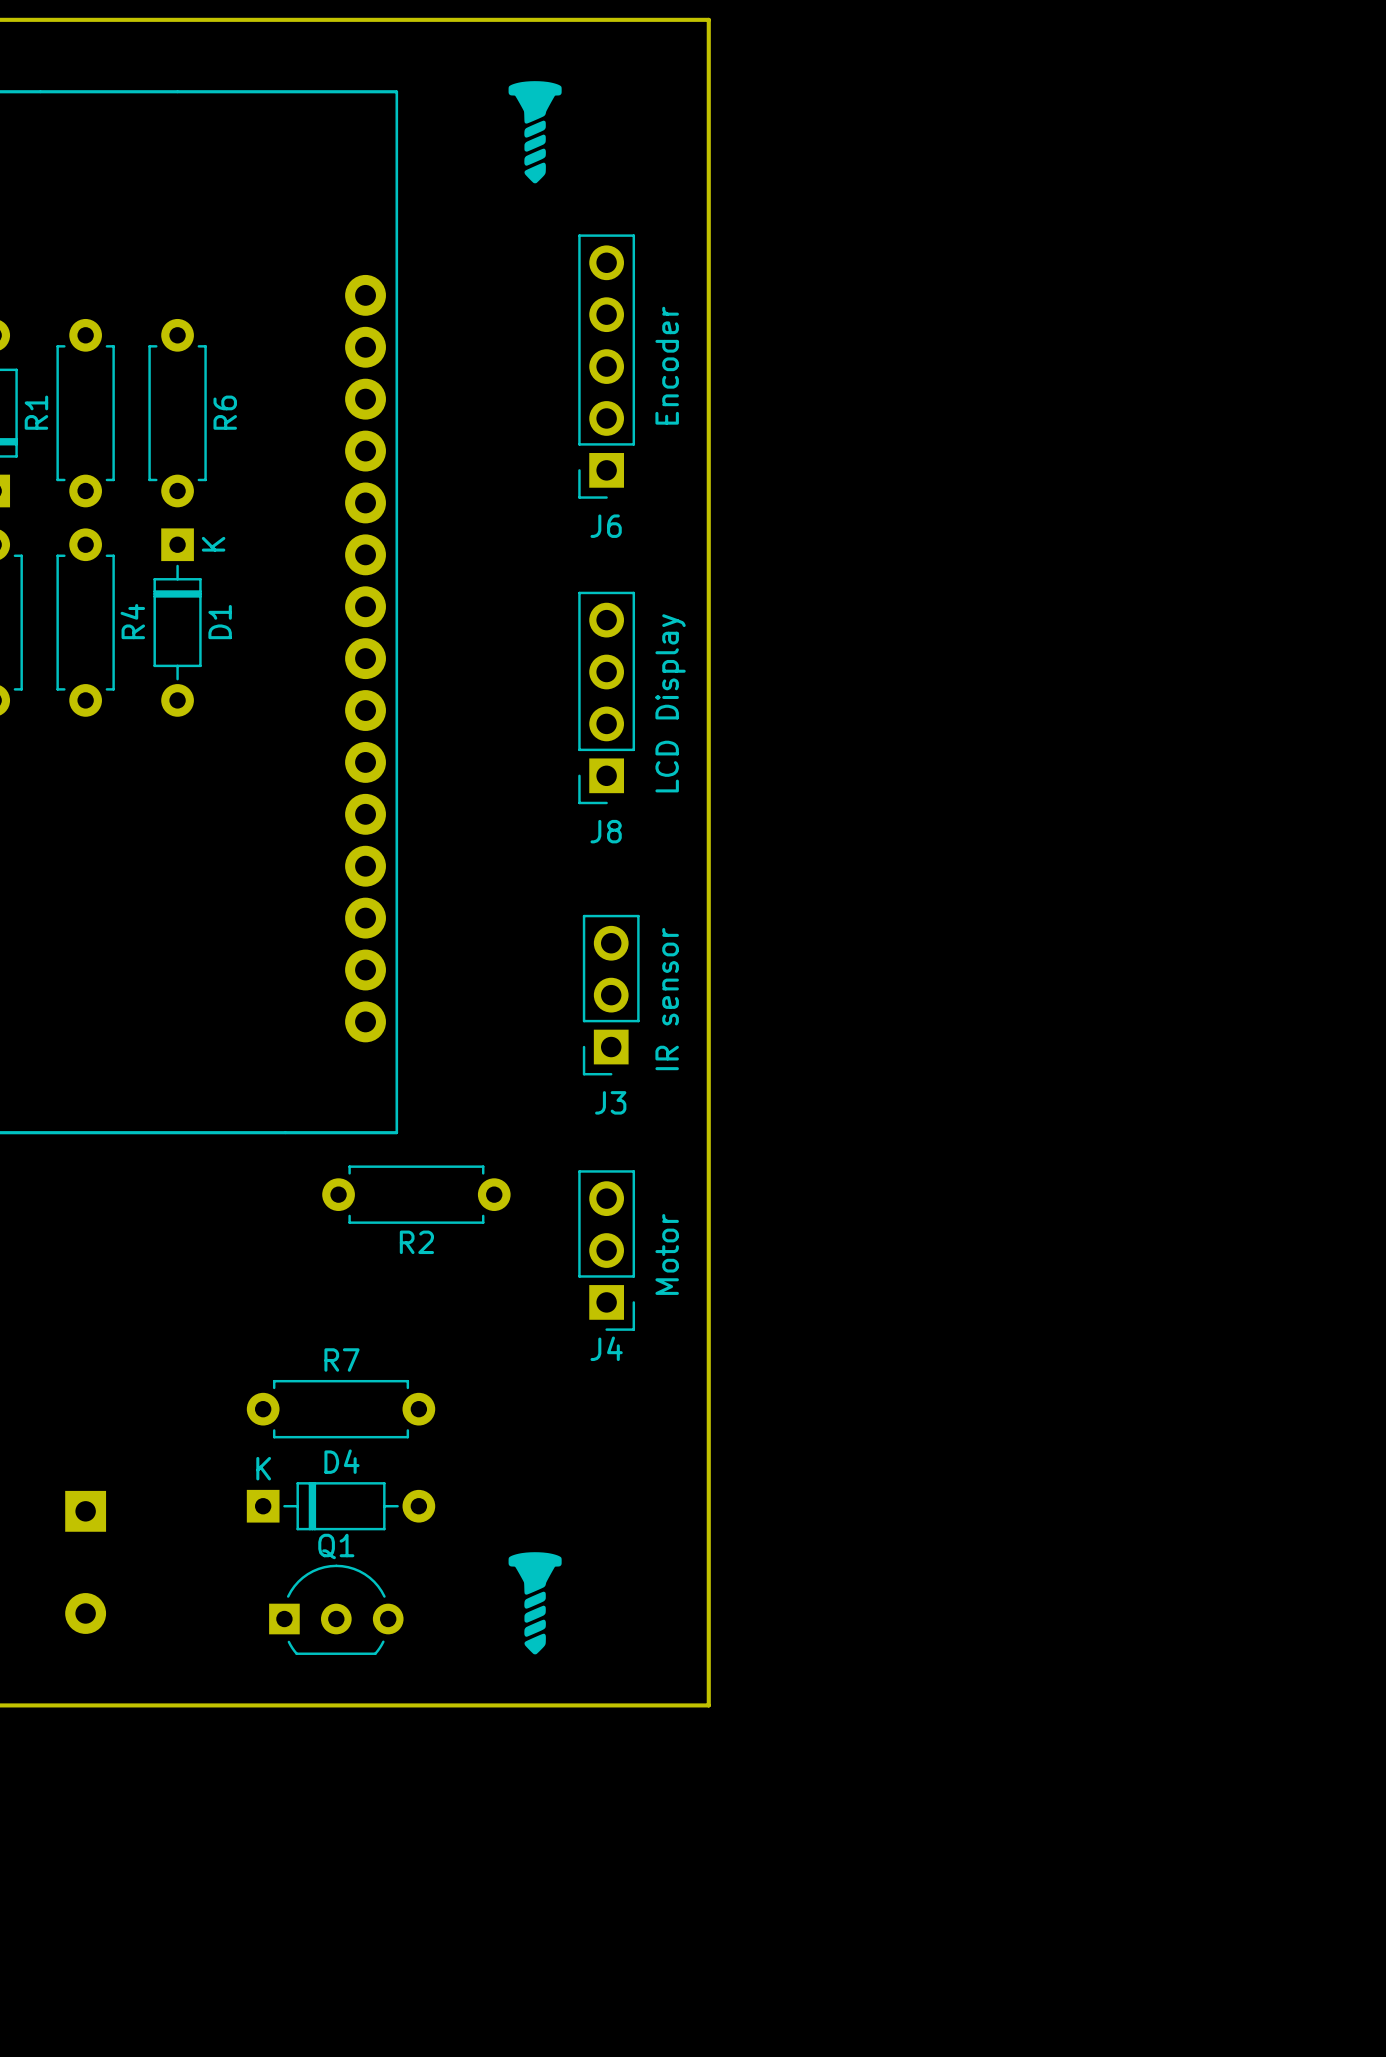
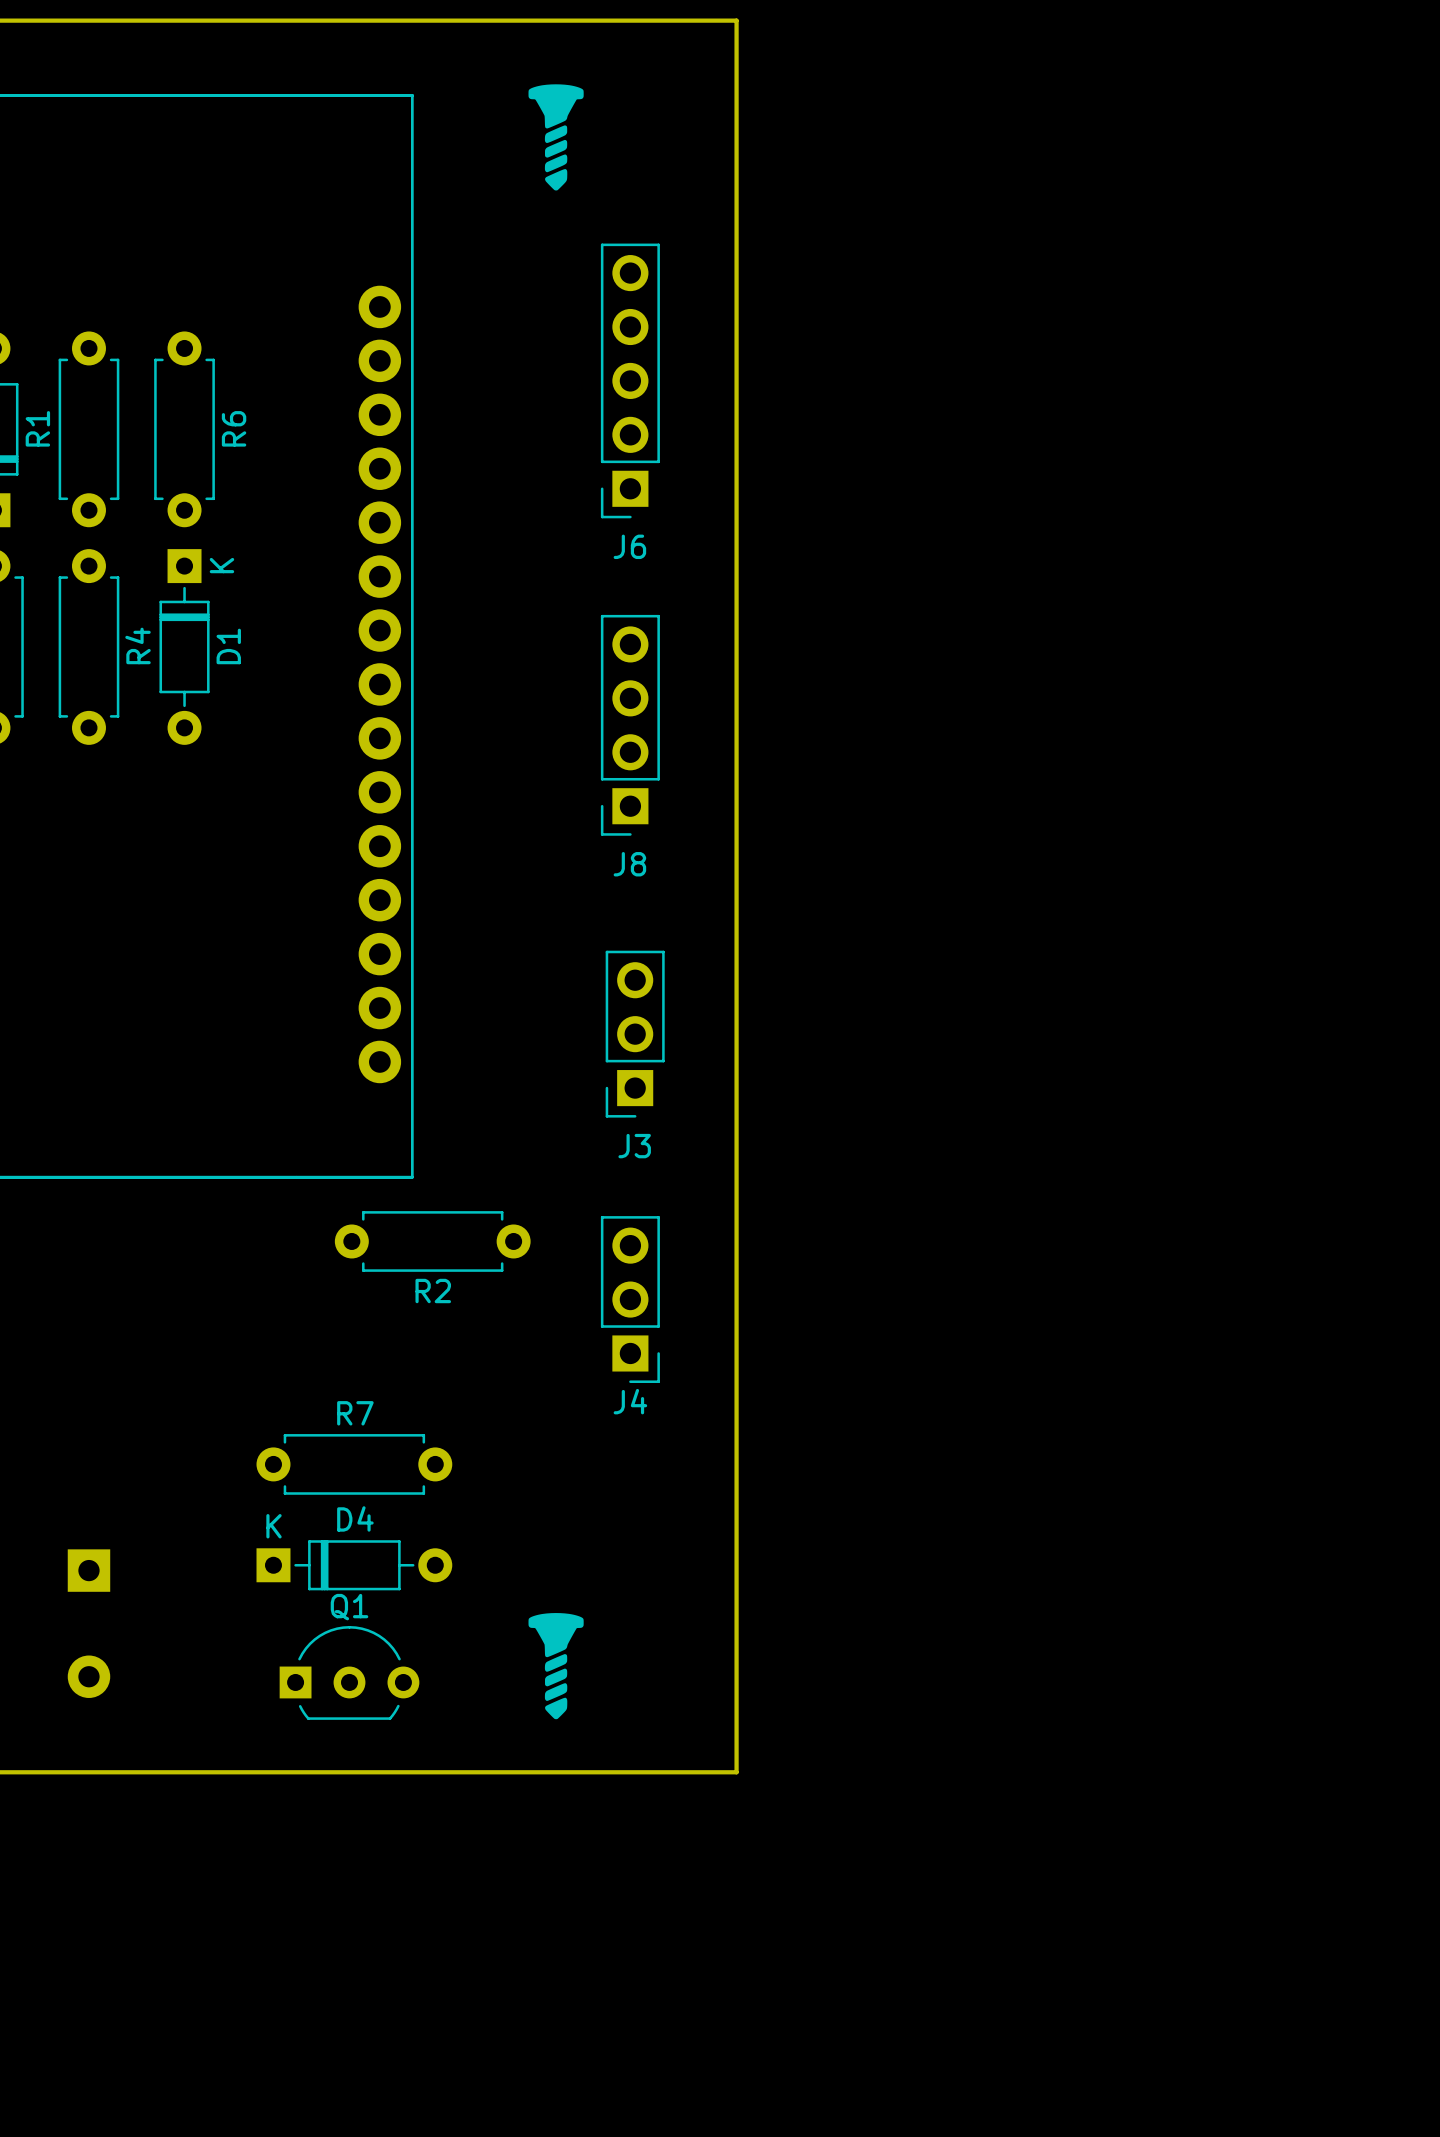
text: Encoder (667, 365) -> none
text: LCD Display (670, 703) -> none
text: IR sensor (667, 999) -> none
text: Motor (667, 1254) -> none

